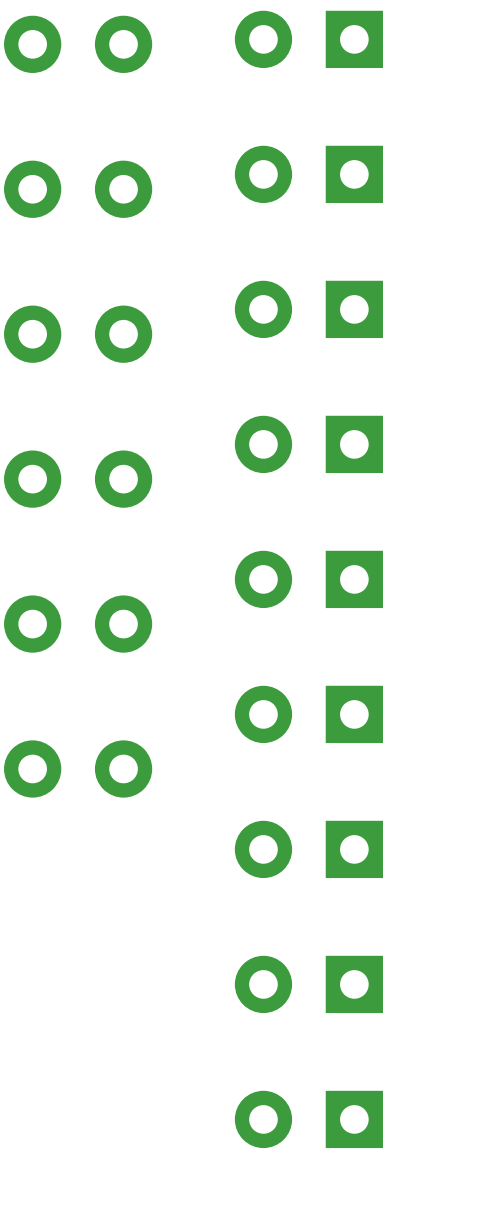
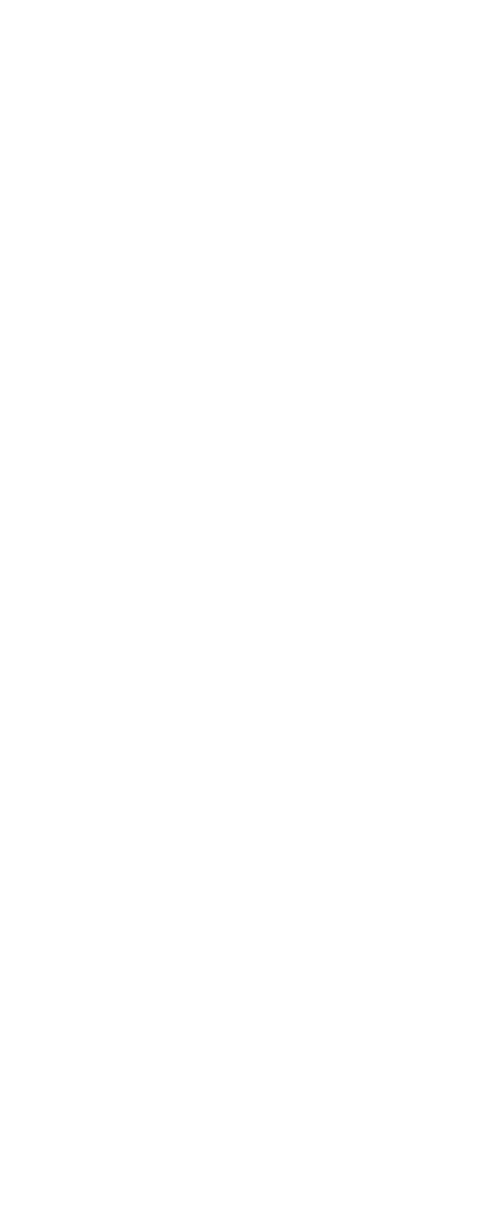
part: (308, 39) -> none
part: (78, 44) -> none
part: (308, 174) -> none
part: (78, 189) -> none
part: (308, 309) -> none
part: (78, 334) -> none
part: (308, 444) -> none
part: (78, 479) -> none
part: (308, 579) -> none
part: (78, 624) -> none
part: (308, 714) -> none
part: (78, 768) -> none
part: (308, 849) -> none
part: (308, 984) -> none
part: (308, 1119) -> none

